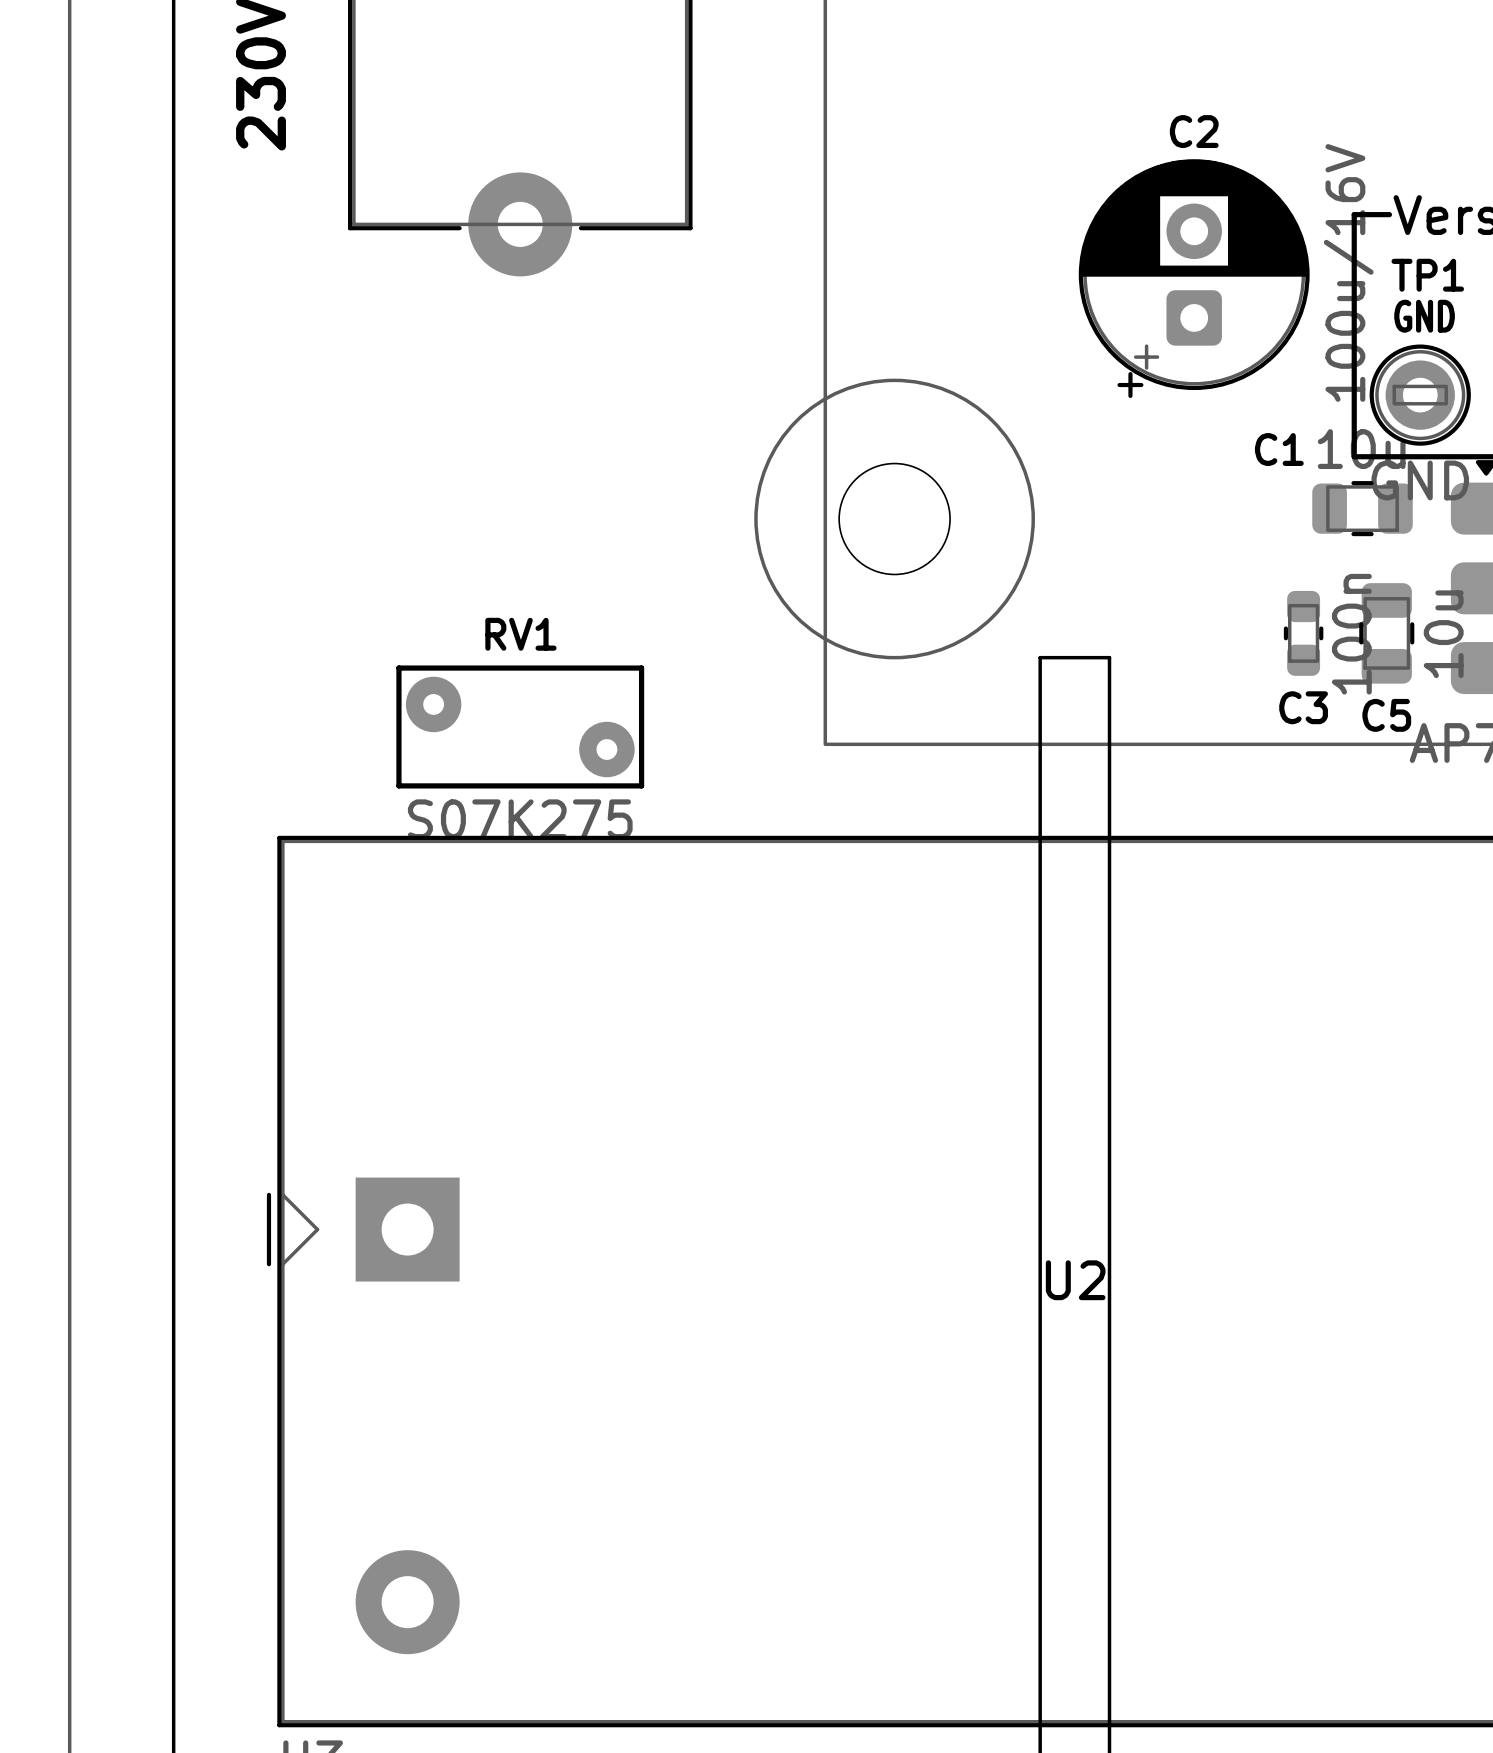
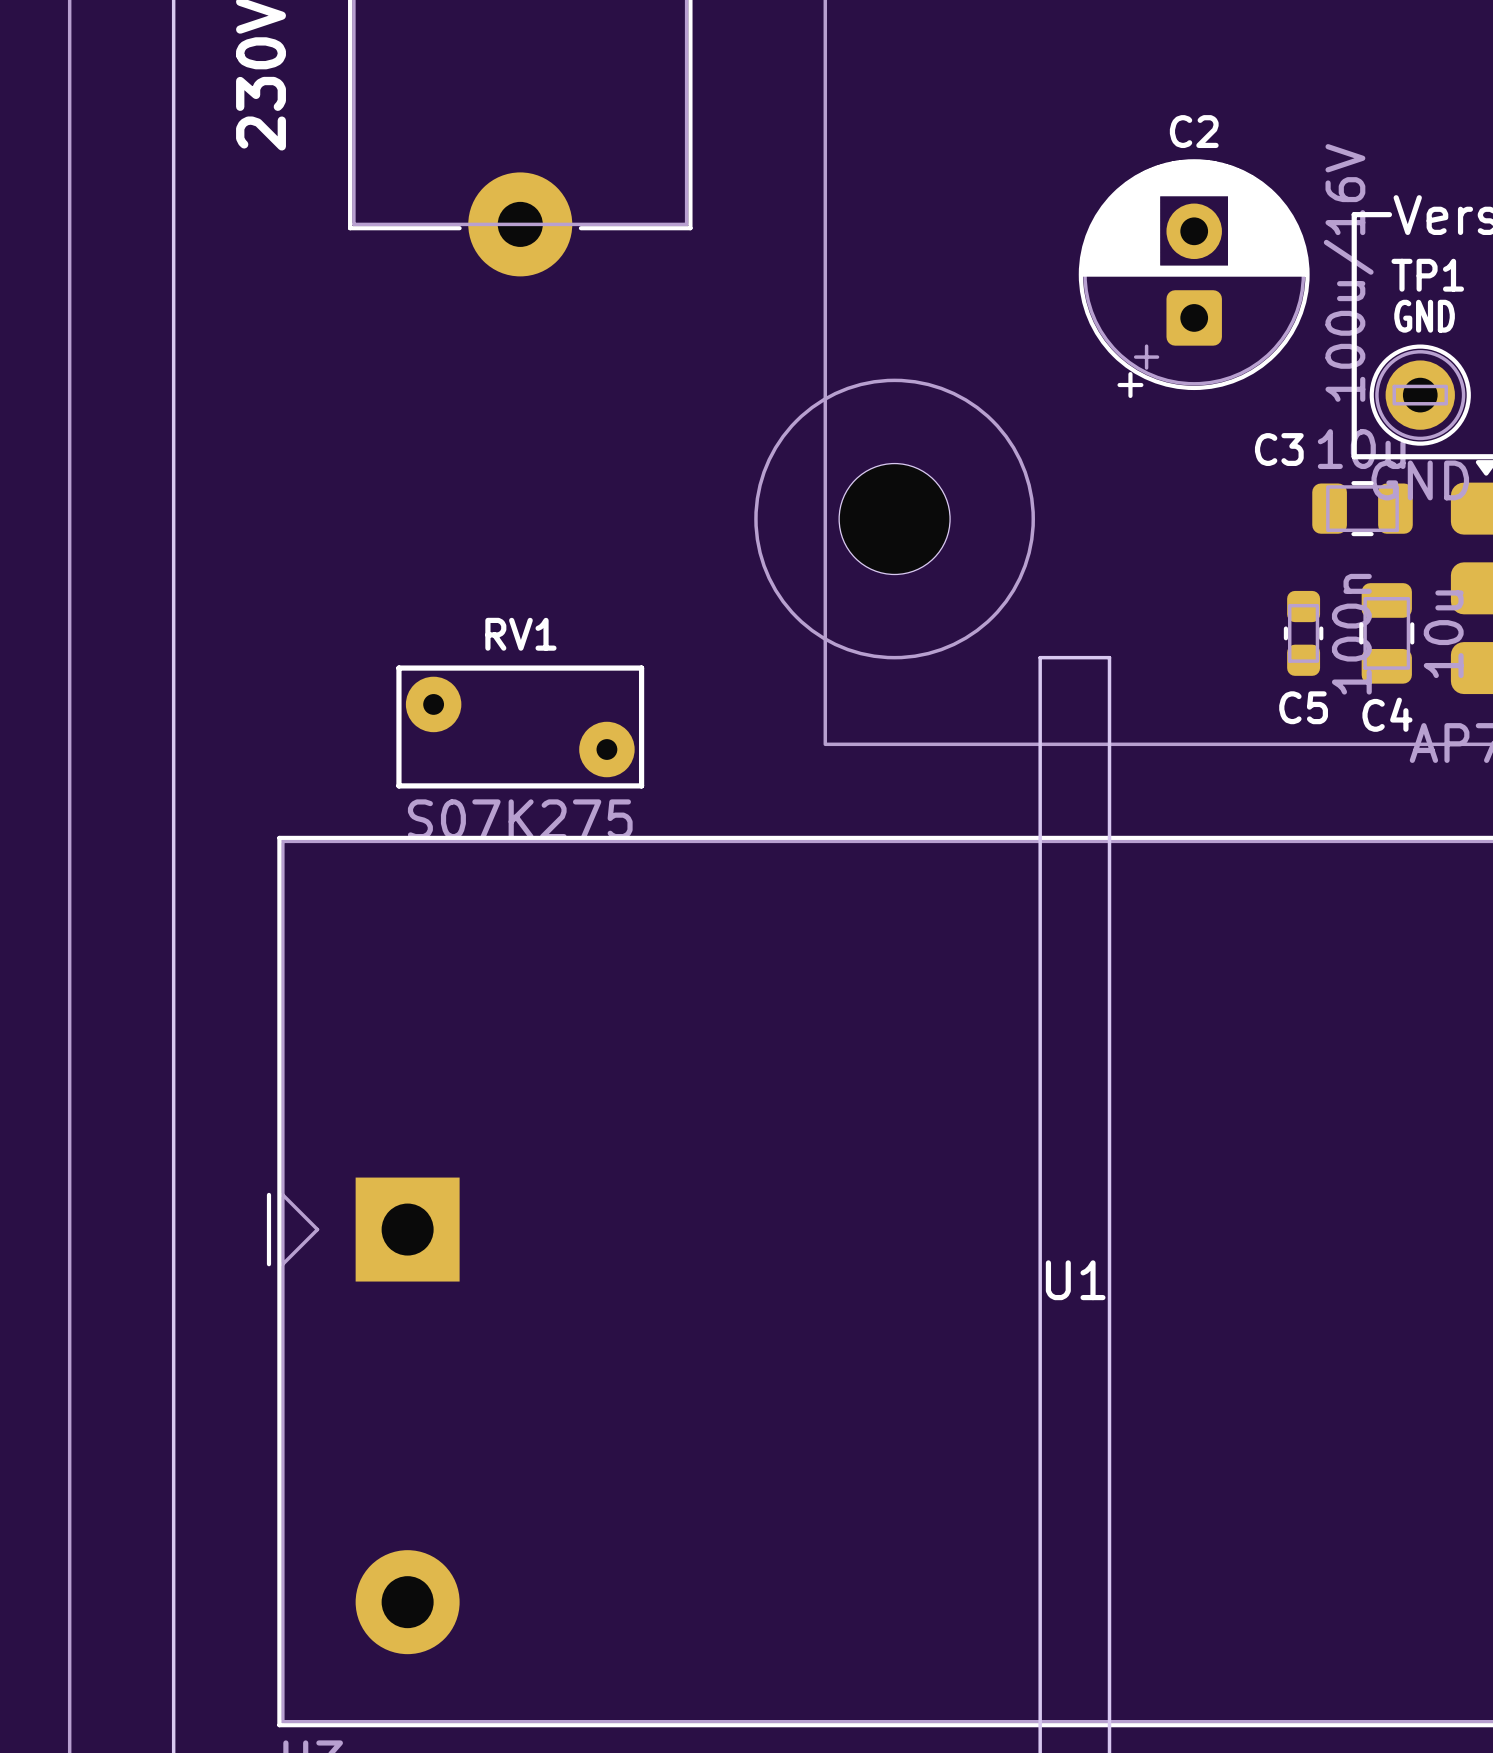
C1 name: C1 (1279, 449) -> C3 (1279, 449)
C3 name: C3 (1303, 707) -> C5 (1303, 707)
C5 name: C5 (1386, 715) -> C4 (1387, 714)
U2 name: U2 (1075, 1280) -> U1 (1075, 1280)

